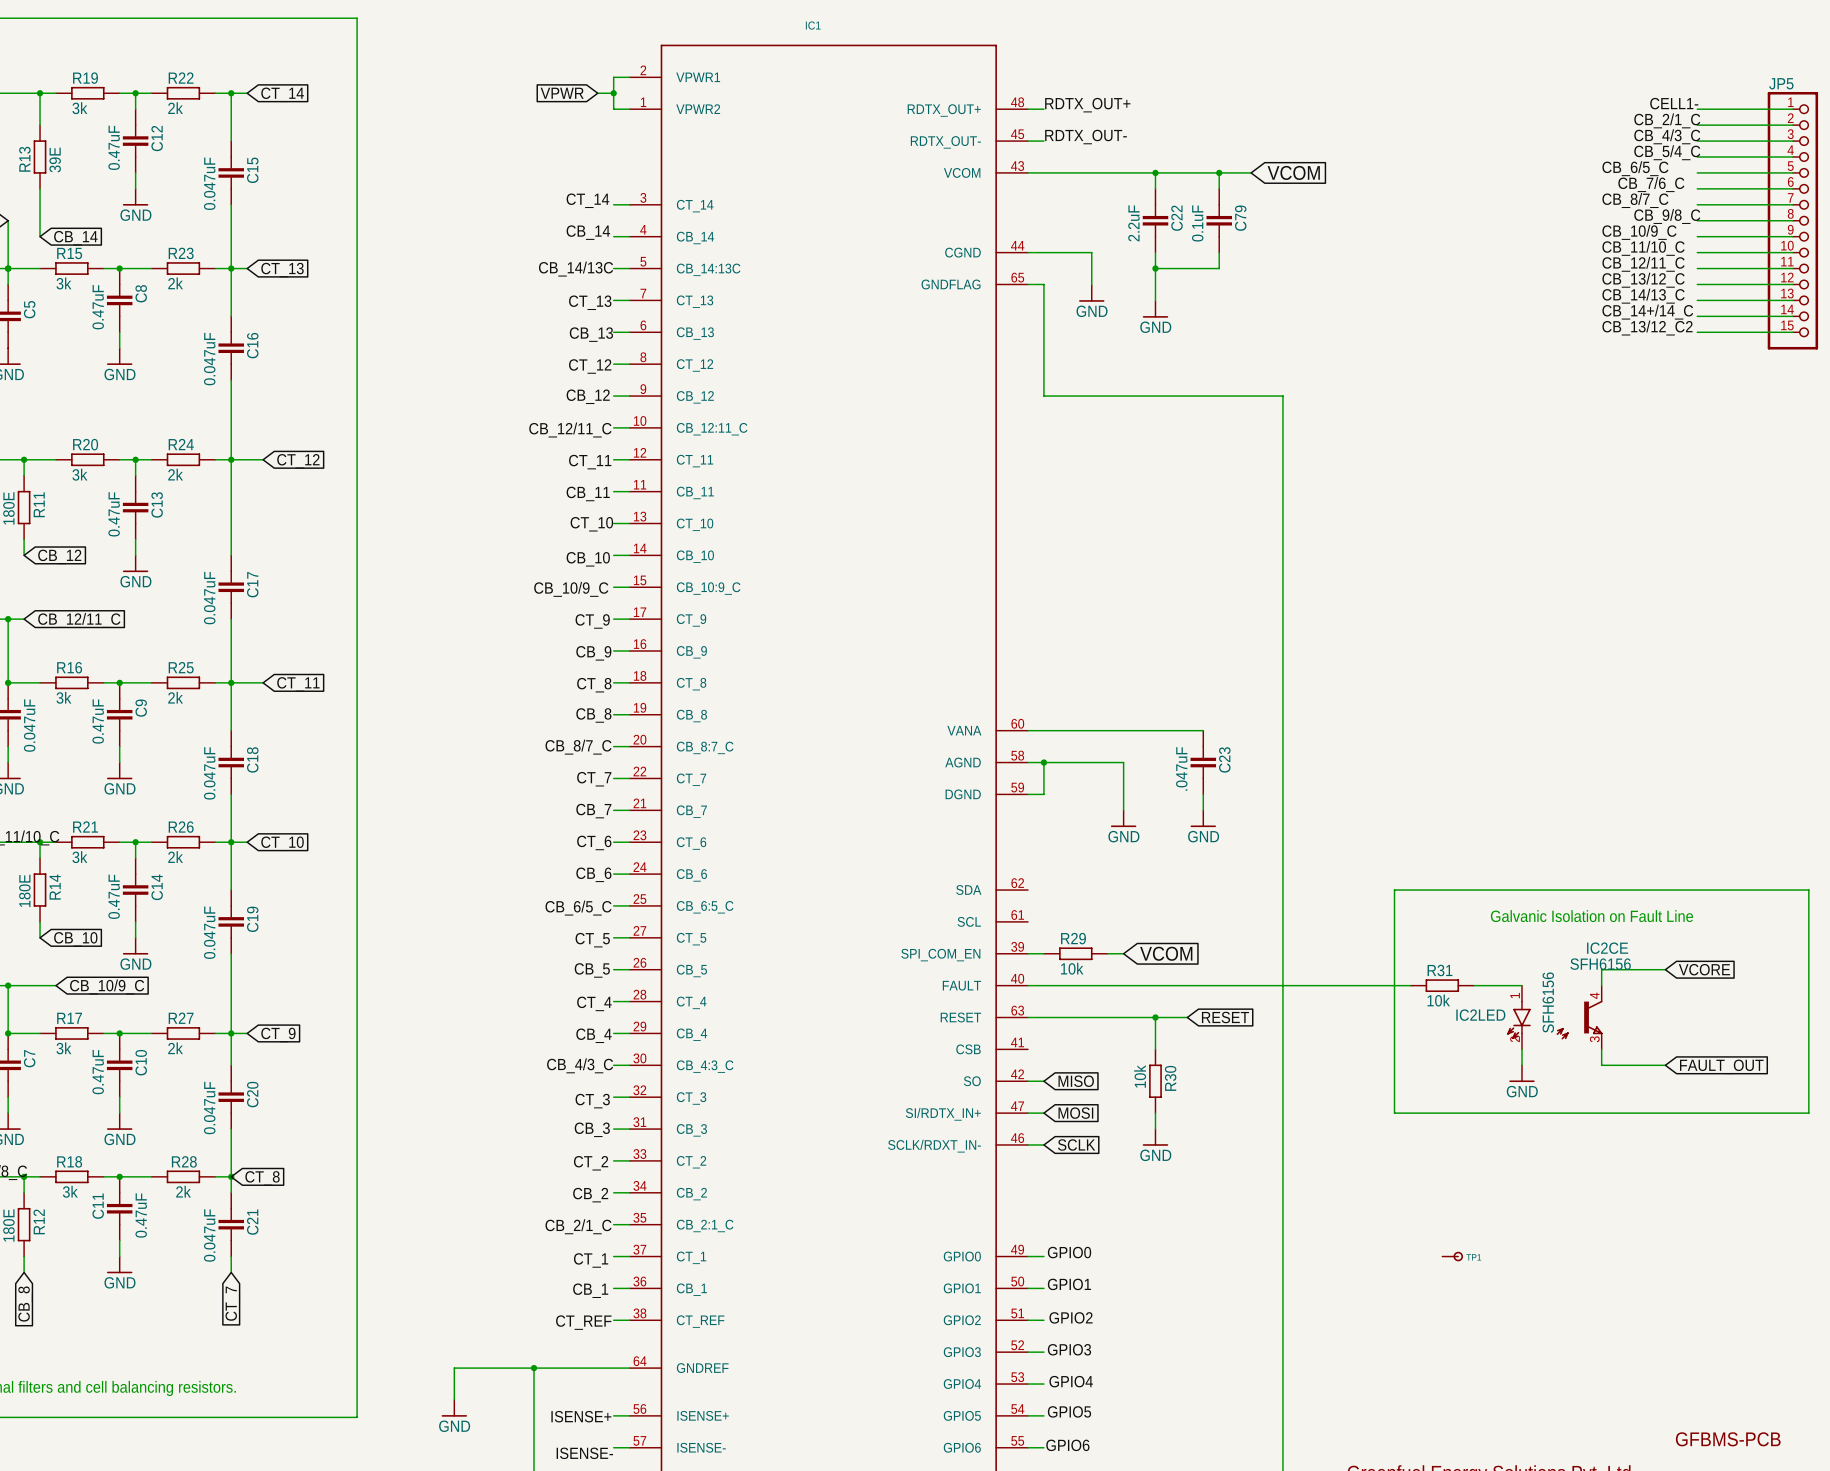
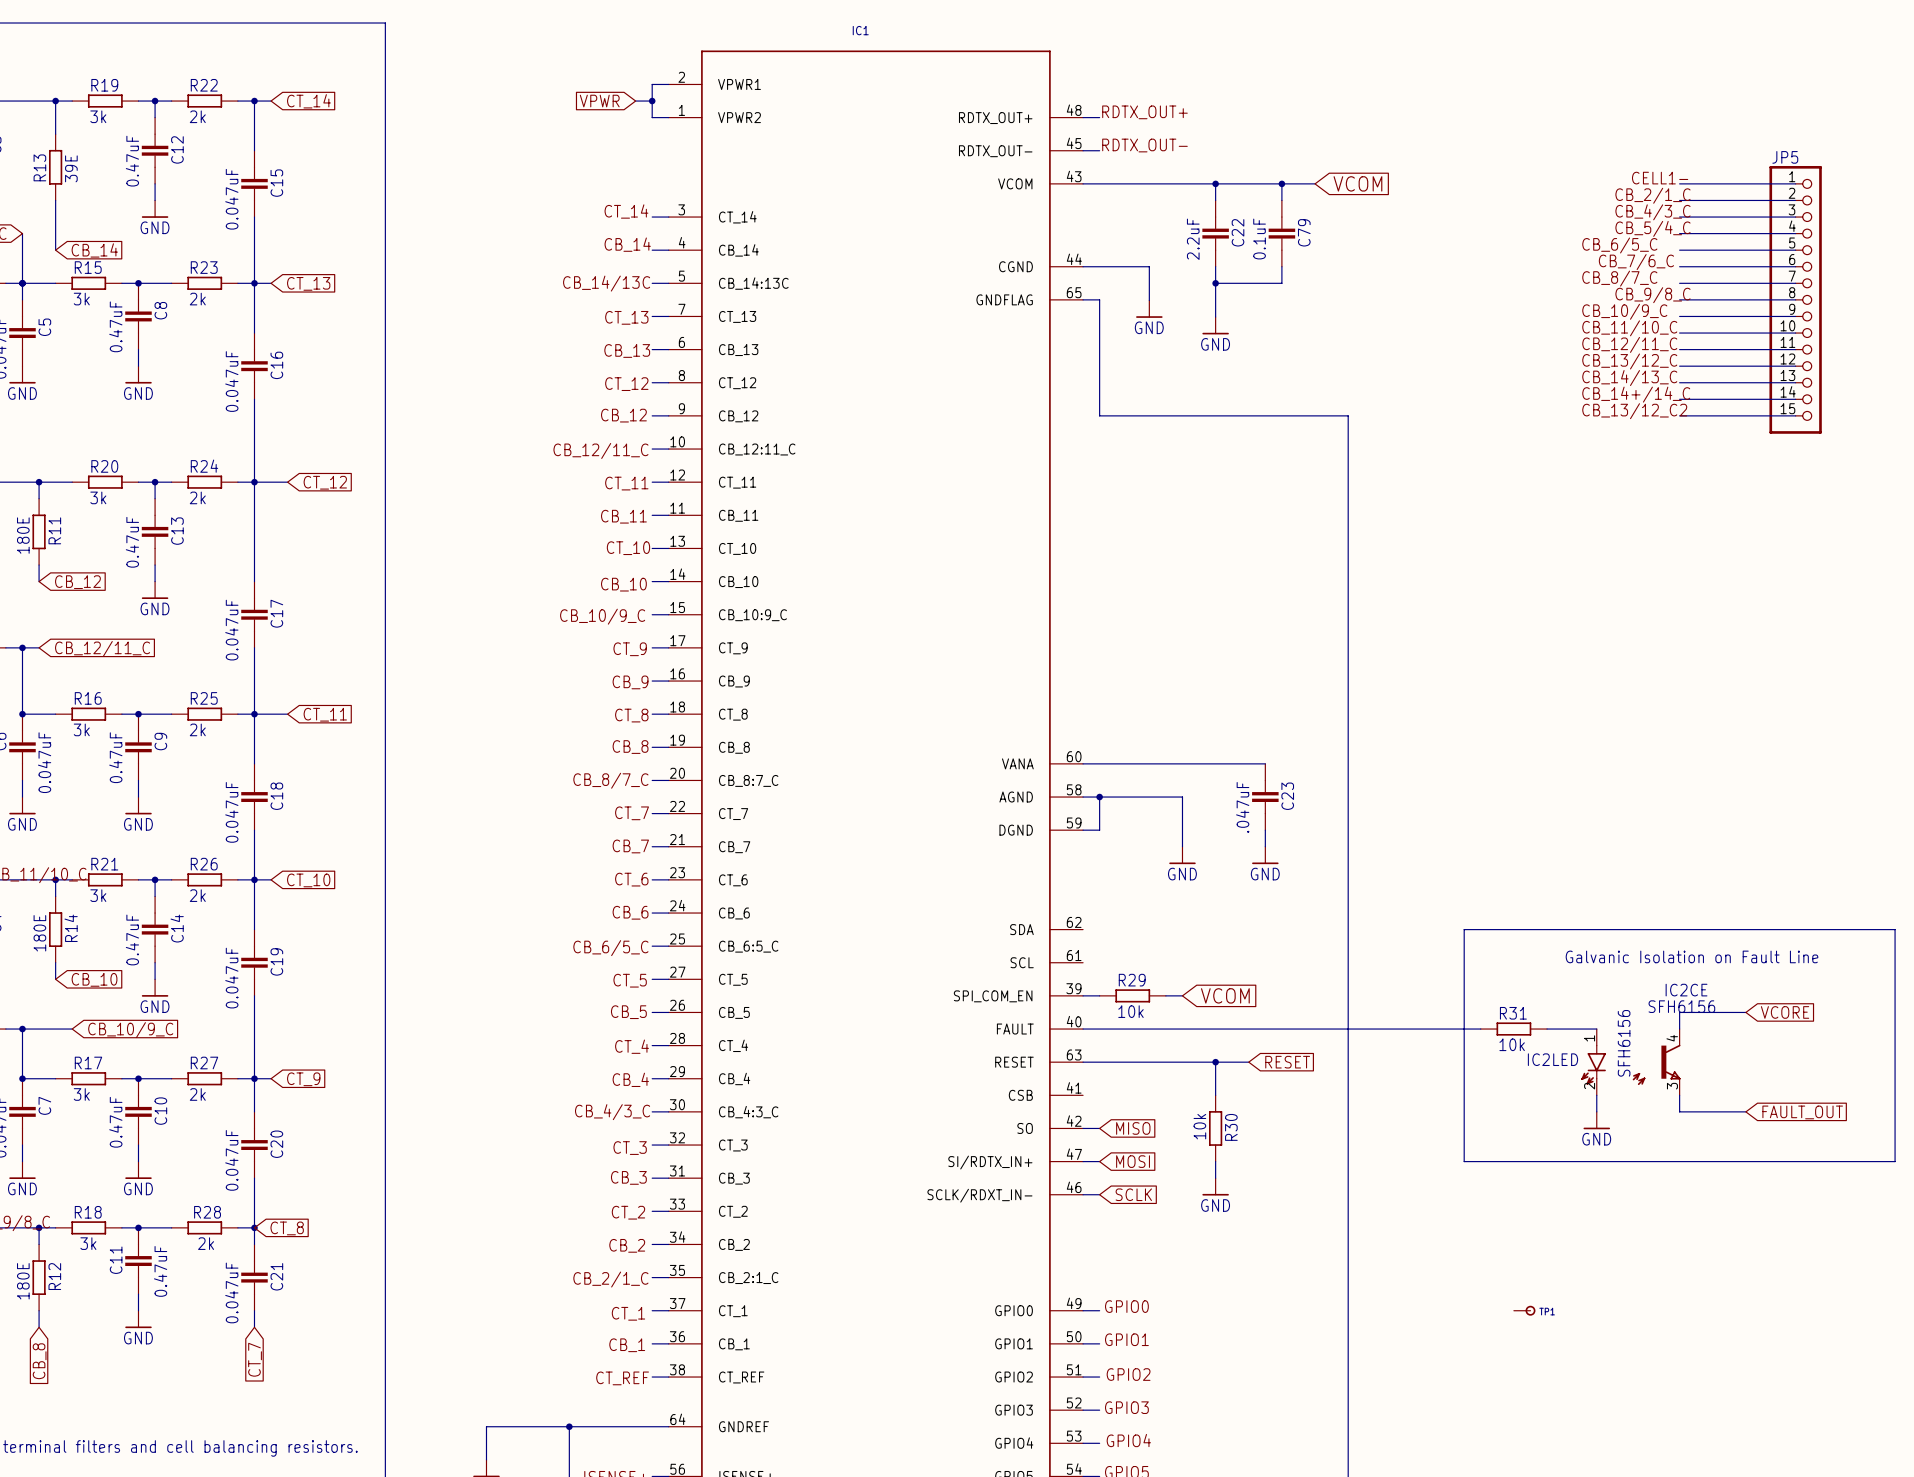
label position: CELL1- (1674, 103) -> CELL1- (1660, 178)
wire: (1697, 109) (1792, 109) -> (1679, 183) (1779, 183)
label position: CB_2/1_C (1667, 120) -> CB_2/1_C (1652, 195)
wire: (1697, 125) (1792, 125) -> (1679, 200) (1779, 200)
label position: CB_4/3_C (1667, 136) -> CB_4/3_C (1652, 212)
wire: (1697, 141) (1792, 141) -> (1679, 217) (1779, 217)
label position: CB_5/4_C (1667, 152) -> CB_5/4_C (1652, 228)
wire: (1697, 157) (1792, 157) -> (1679, 233) (1779, 233)
label position: CB_6/5_C (1635, 168) -> CB_6/5_C (1619, 245)
wire: (1713, 172) (1792, 172) -> none
label position: CB_7/6_C (1651, 184) -> CB_7/6_C (1636, 262)
wire: (1713, 188) (1792, 188) -> none
label position: CB_8/7_C (1635, 200) -> CB_8/7_C (1619, 278)
wire: (1713, 204) (1792, 204) -> none
label position: CB_9/8_C (1667, 216) -> CB_9/8_C (1652, 295)
wire: (1713, 220) (1792, 220) -> none
JP5 position: (1792, 220) -> (1795, 299)
label position: CB_10/9_C (1639, 232) -> CB_10/9_C (1624, 311)
wire: none -> (1679, 250) (1779, 250)
wire: (1713, 236) (1792, 236) -> none
label position: CB_11/10_C (1643, 248) -> CB_11/10_C (1629, 328)
wire: none -> (1679, 266) (1779, 266)
wire: (1713, 252) (1792, 252) -> none
label position: CB_12/11_C (1643, 264) -> CB_12/11_C (1629, 344)
wire: none -> (1679, 283) (1779, 283)
wire: (1713, 268) (1792, 268) -> none
label position: CB_13/12_C (1643, 280) -> CB_13/12_C (1629, 361)
wire: none -> (1679, 299) (1779, 299)
wire: (1713, 284) (1792, 284) -> none
label position: CB_14/13_C (1643, 296) -> CB_14/13_C (1629, 378)
wire: none -> (1679, 316) (1779, 316)
wire: (1713, 300) (1792, 300) -> none
label position: CB_14+/14_C (1647, 312) -> CB_14+/14_C (1636, 394)
wire: none -> (1679, 333) (1779, 333)
wire: (1713, 316) (1792, 316) -> none
label position: CB_13/12_C2 (1647, 328) -> CB_13/12_C2 (1634, 411)
wire: none -> (1679, 349) (1779, 349)
wire: (1713, 332) (1792, 332) -> none
wire: none -> (1679, 366) (1795, 366)
wire: none -> (1679, 382) (1795, 382)
wire: none -> (1679, 399) (1795, 399)
wire: none -> (1679, 415) (1795, 415)

